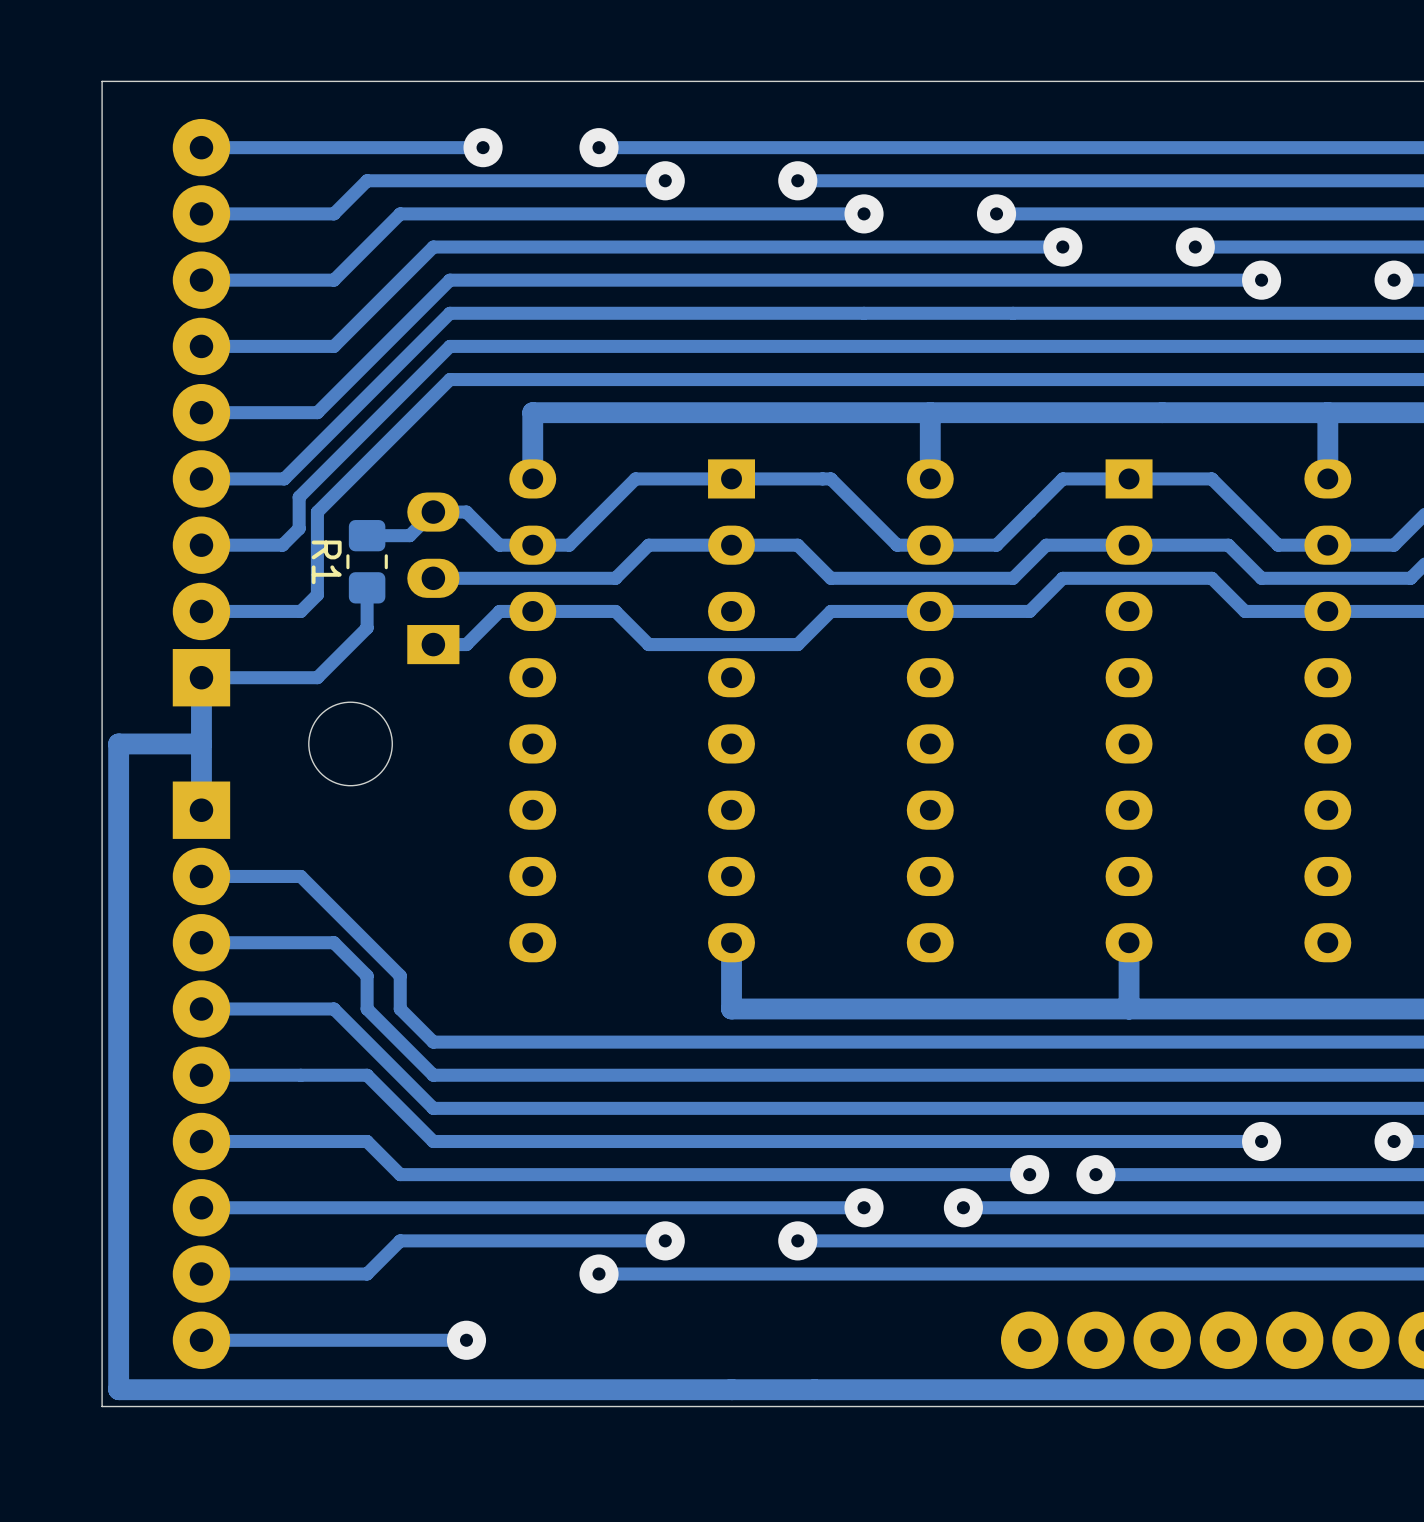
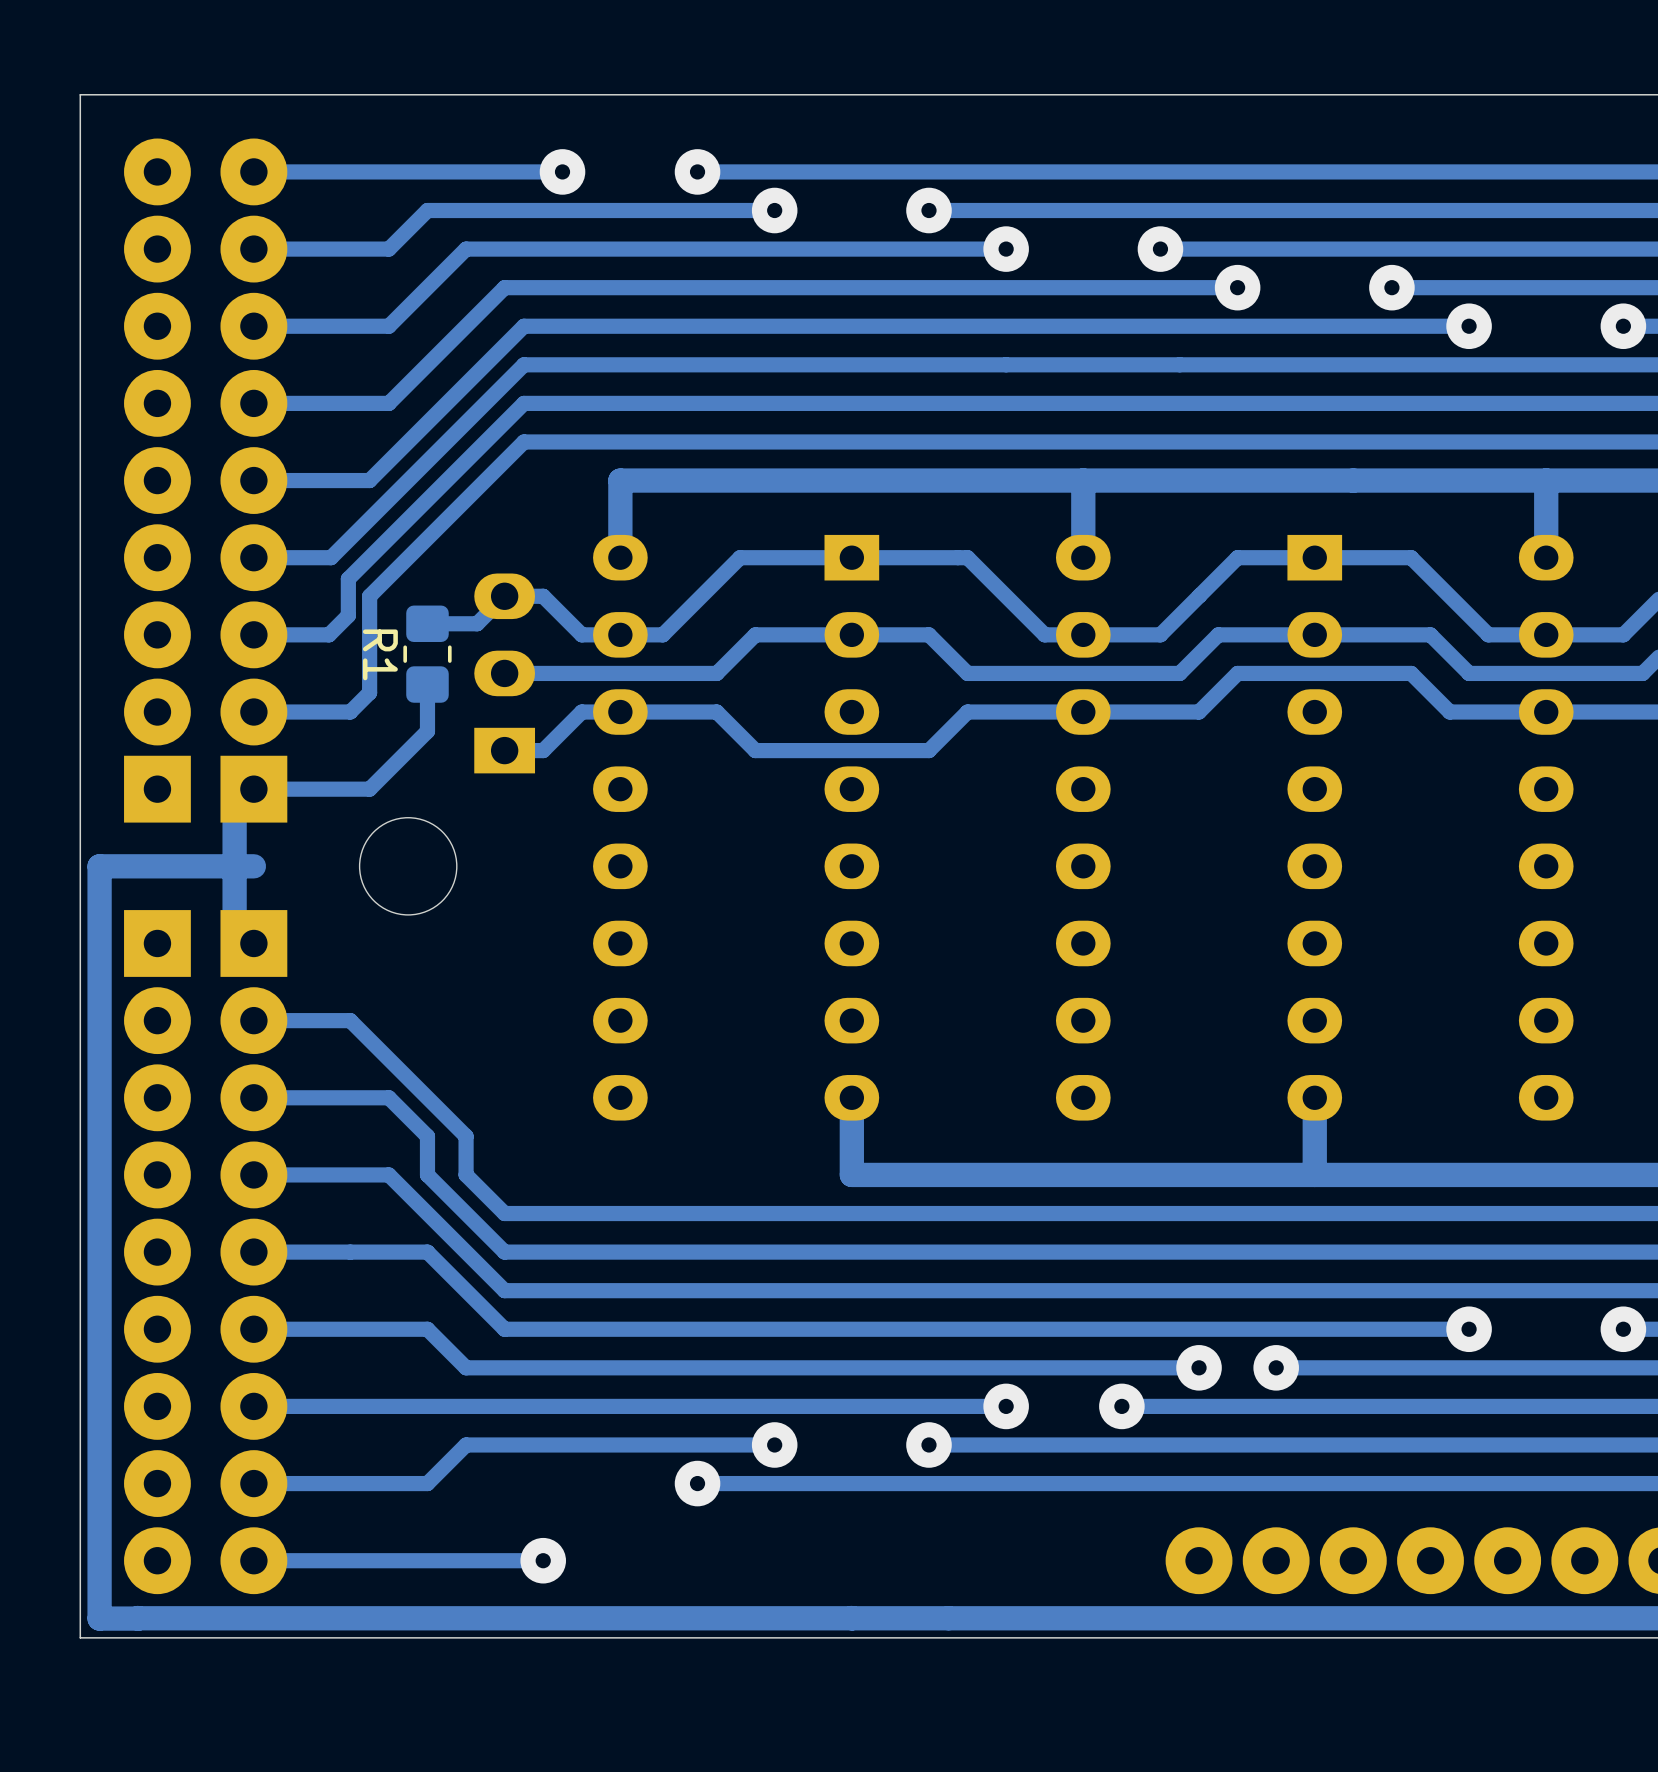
board edge: (102, 81) (102, 1406) -> (118, 94) (80, 94) (80, 1637) (118, 1637)
part: none -> (157, 480)
part position: (201, 412) -> (253, 480)
track: (118, 743) (118, 1389) -> (138, 866) (99, 866) (99, 1618) (138, 1618)
track: none -> (253, 866) (234, 866)
part: none -> (157, 1252)
part position: (201, 1075) -> (253, 1252)

